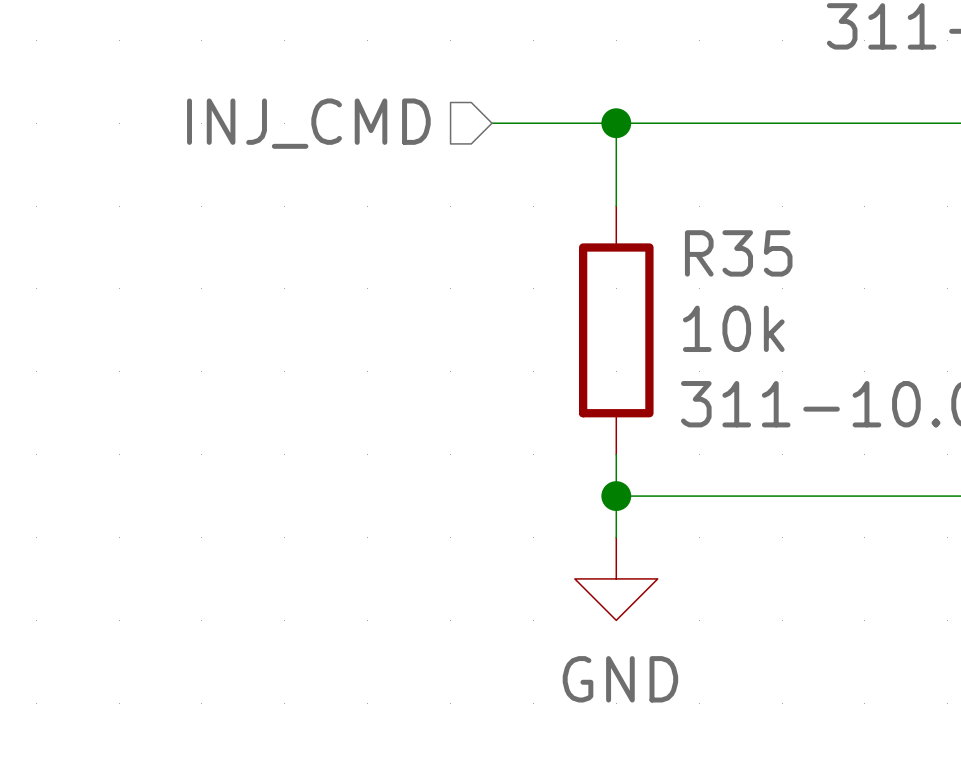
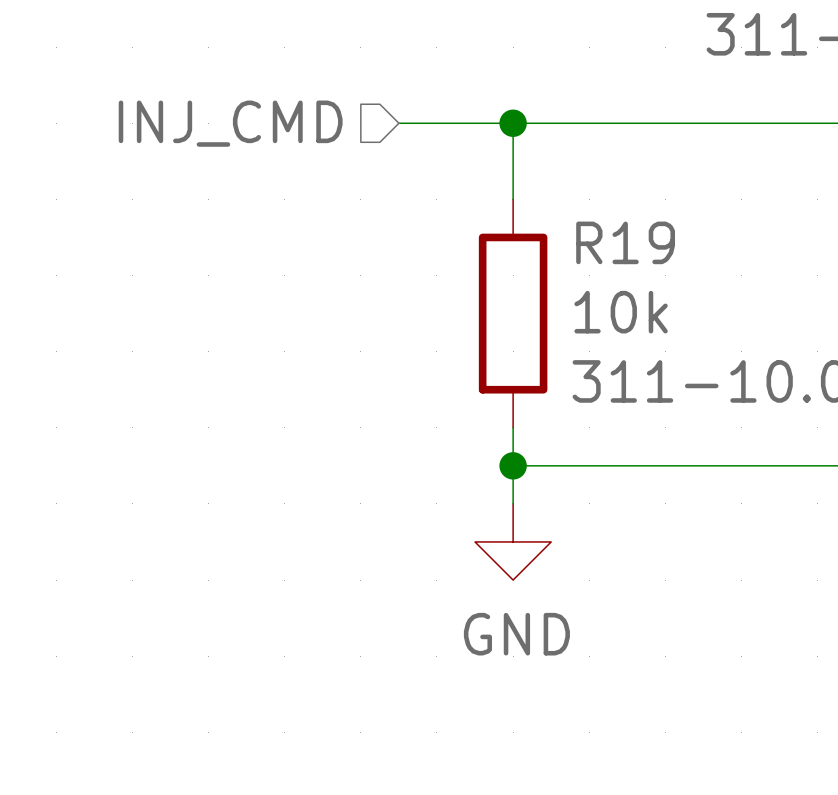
R35 name: R35 (738, 253) -> R19 (625, 242)

